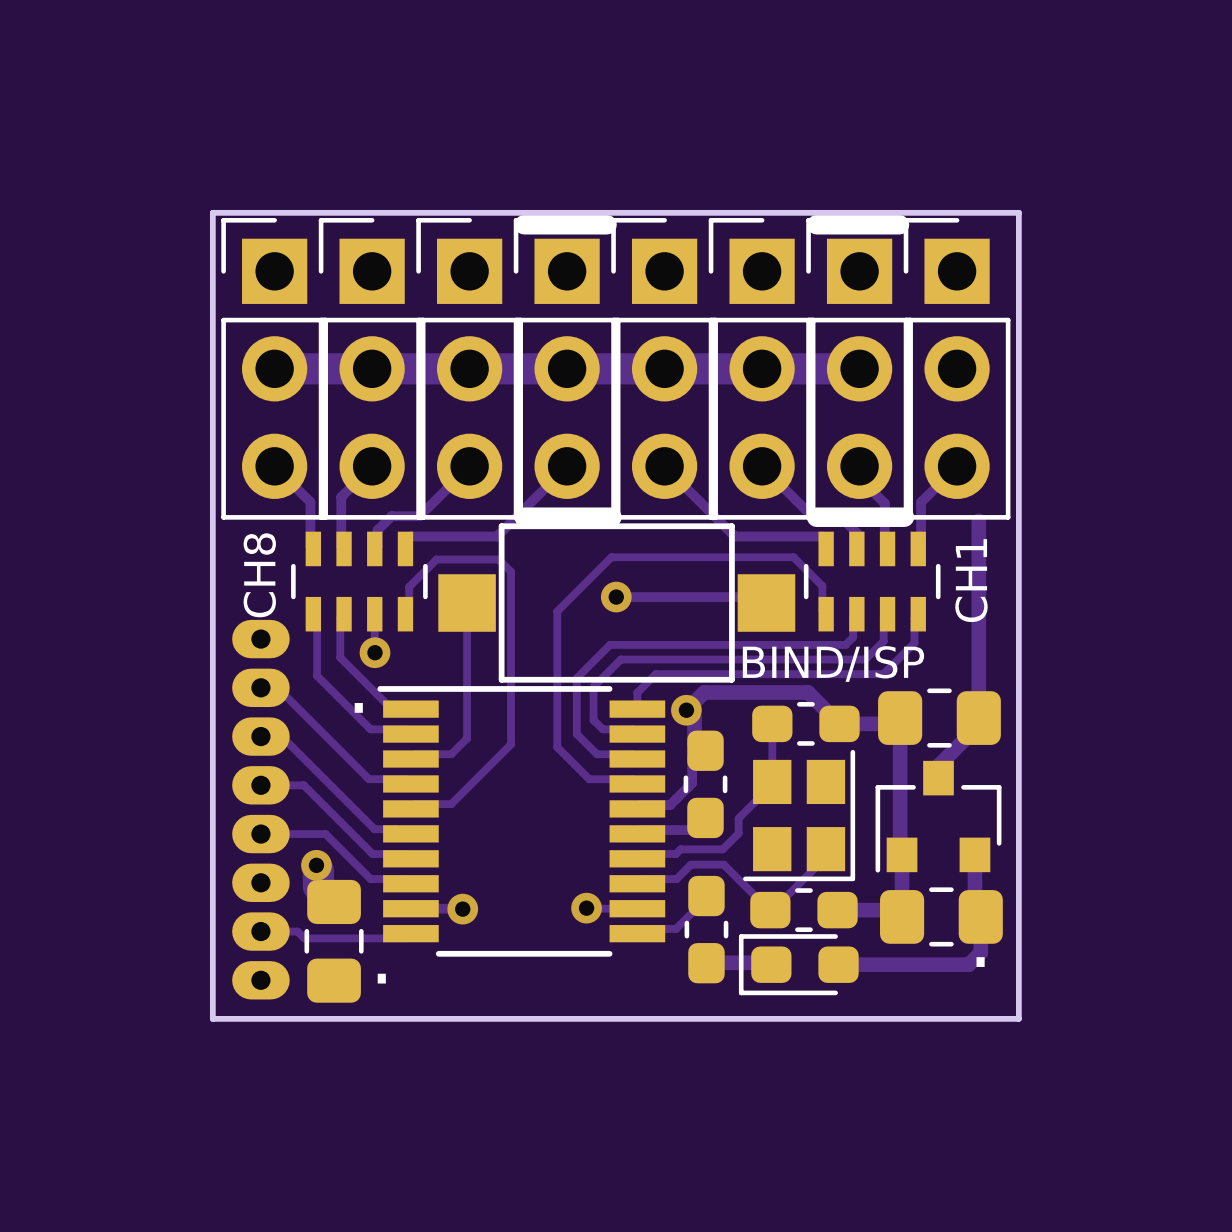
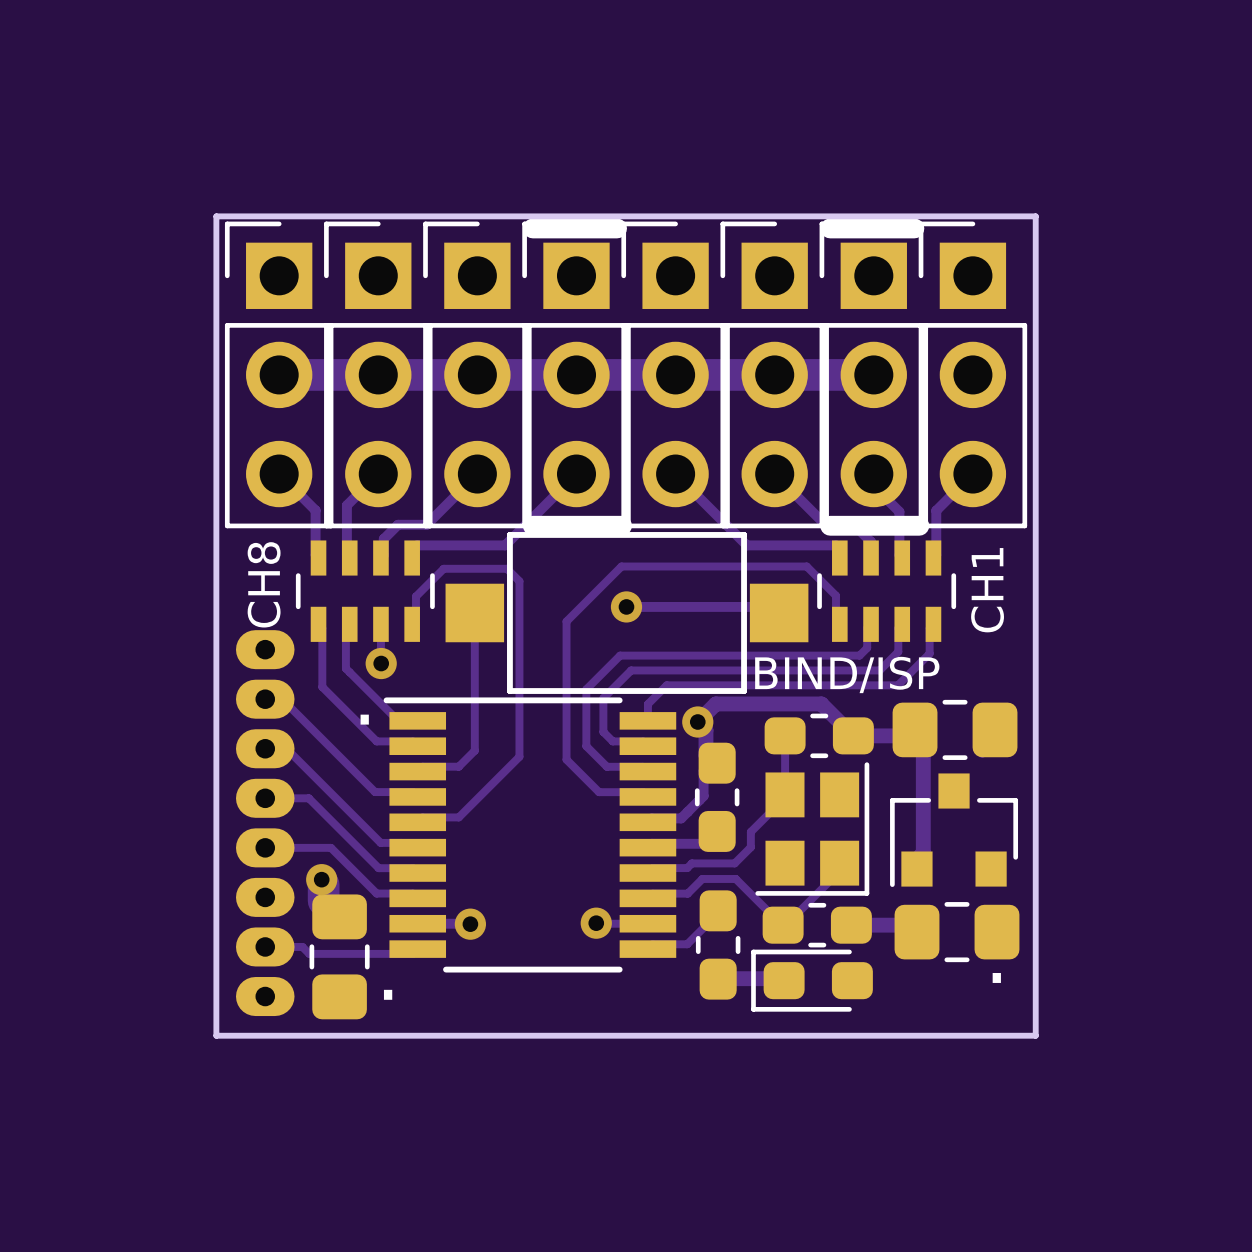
track: (978, 520) (978, 725) (938, 765) (938, 778) -> none
track: (900, 718) (902, 916) -> (915, 729) (923, 738) (923, 852) (915, 861) (922, 869)
track: (974, 854) (974, 911) (980, 916) (980, 952) (968, 964) (838, 964) -> none

